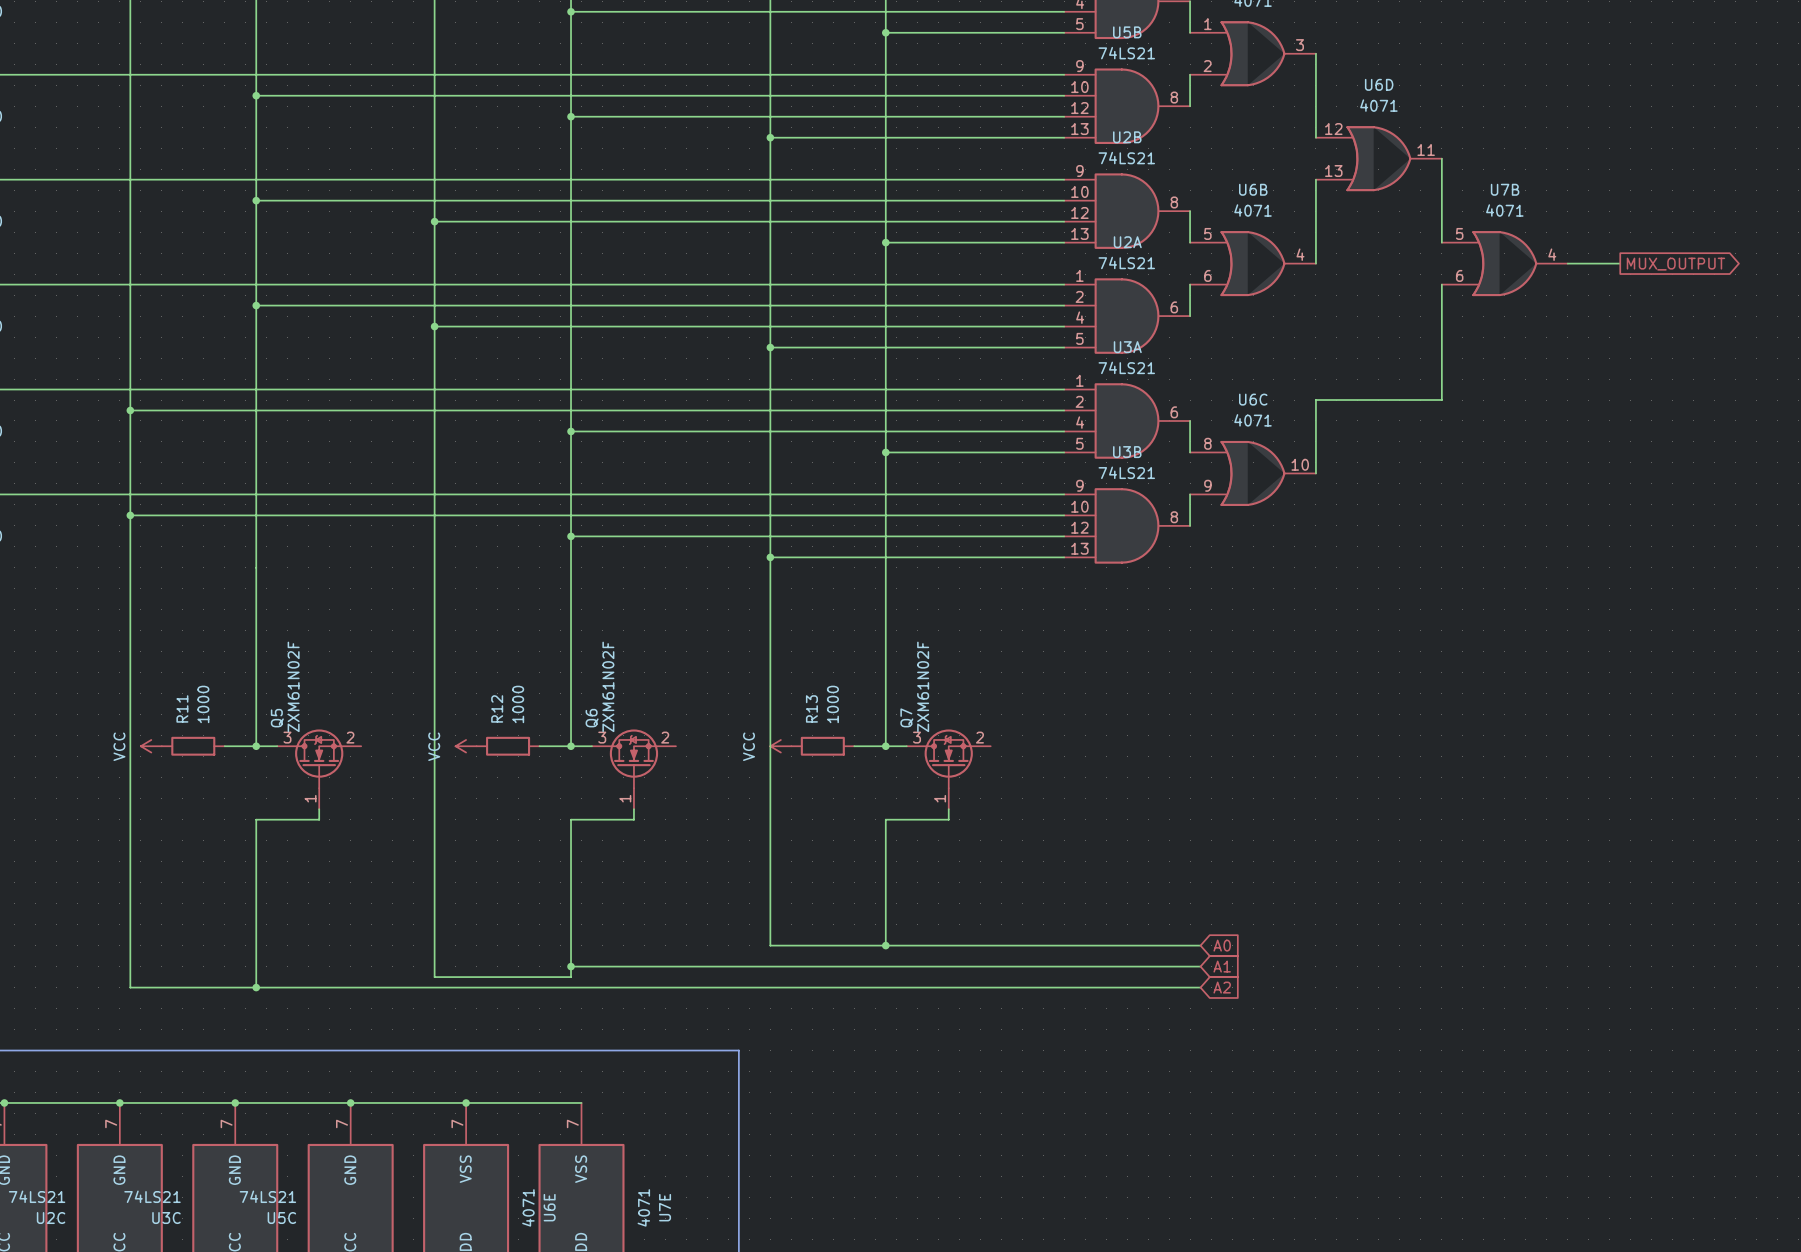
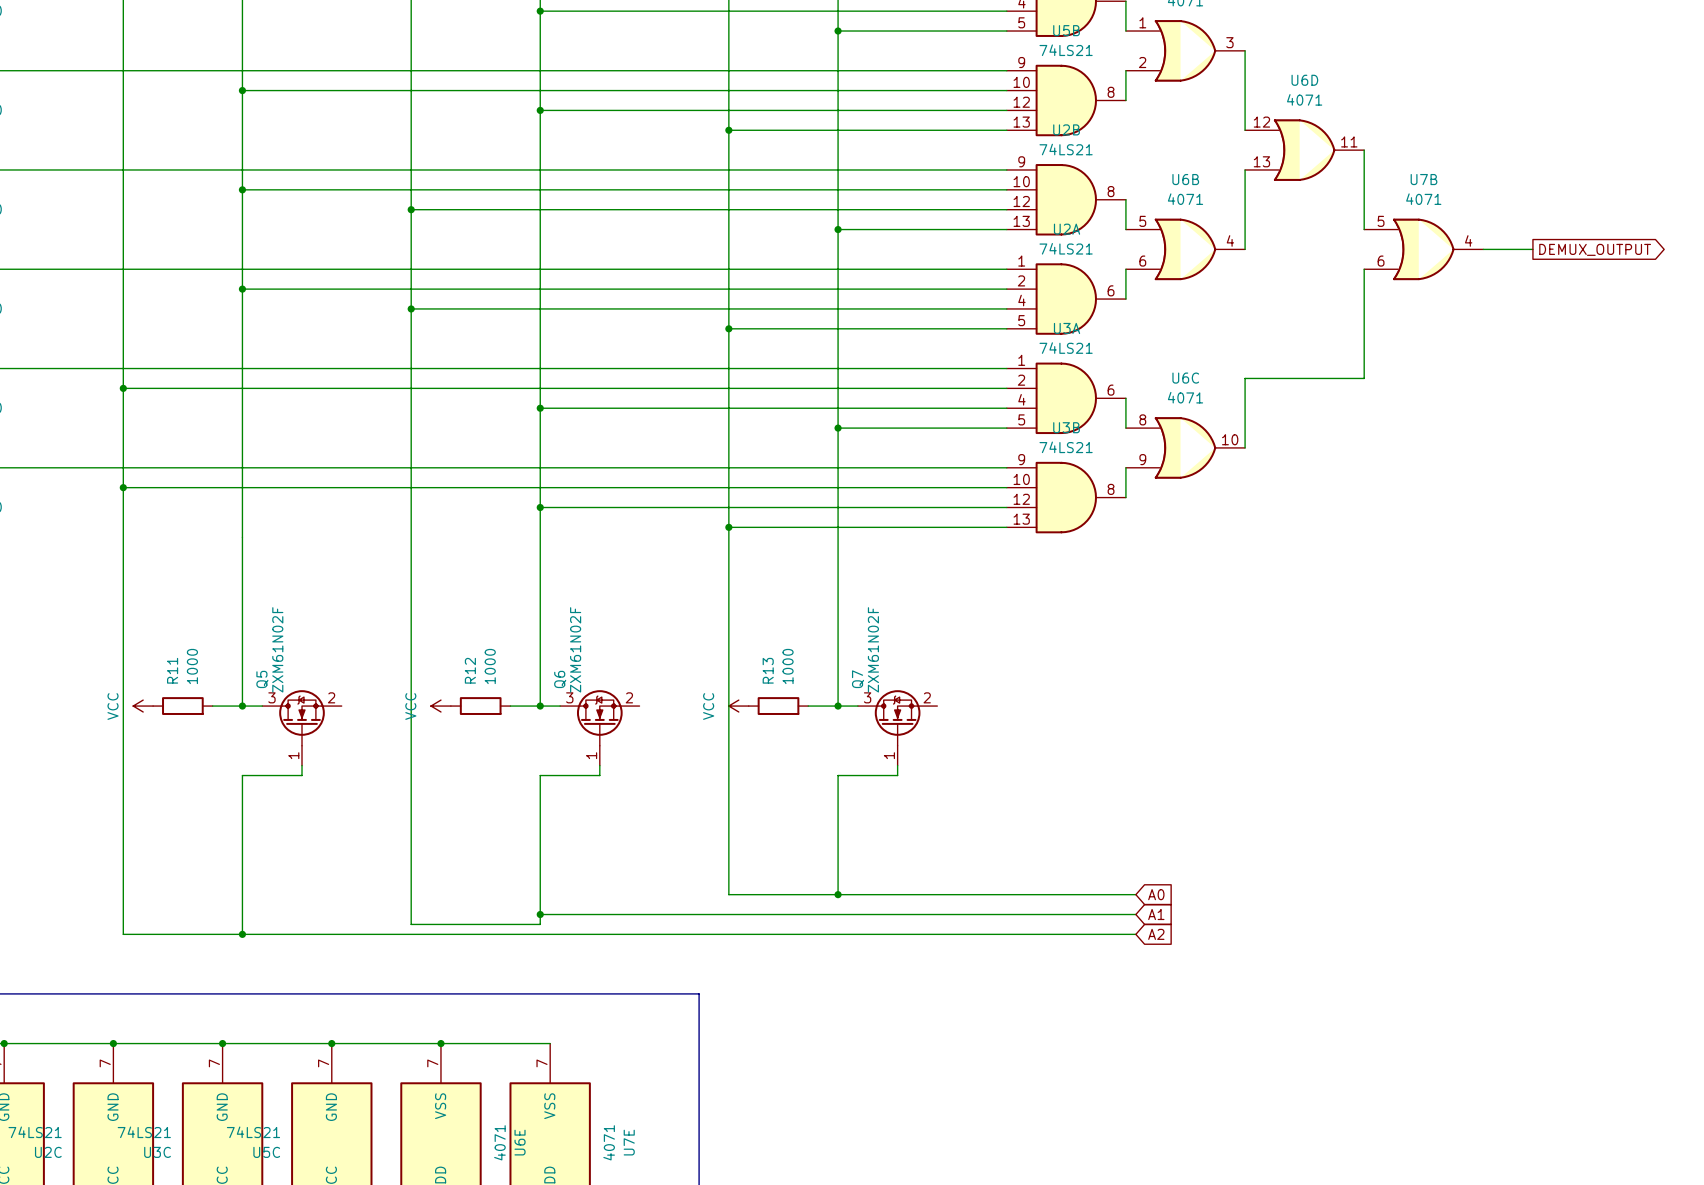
global label: MUX_OUTPUT (1675, 264) -> DEMUX_OUTPUT (1595, 249)

